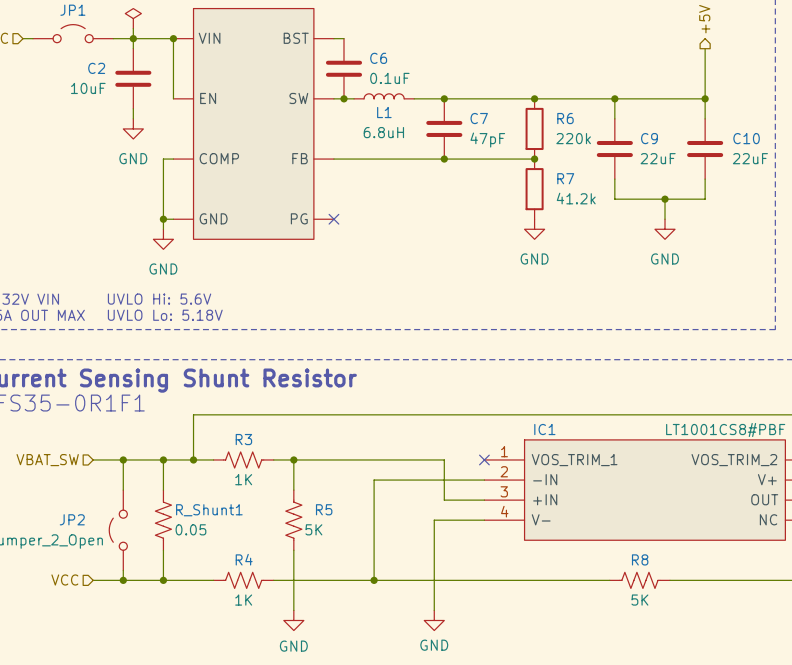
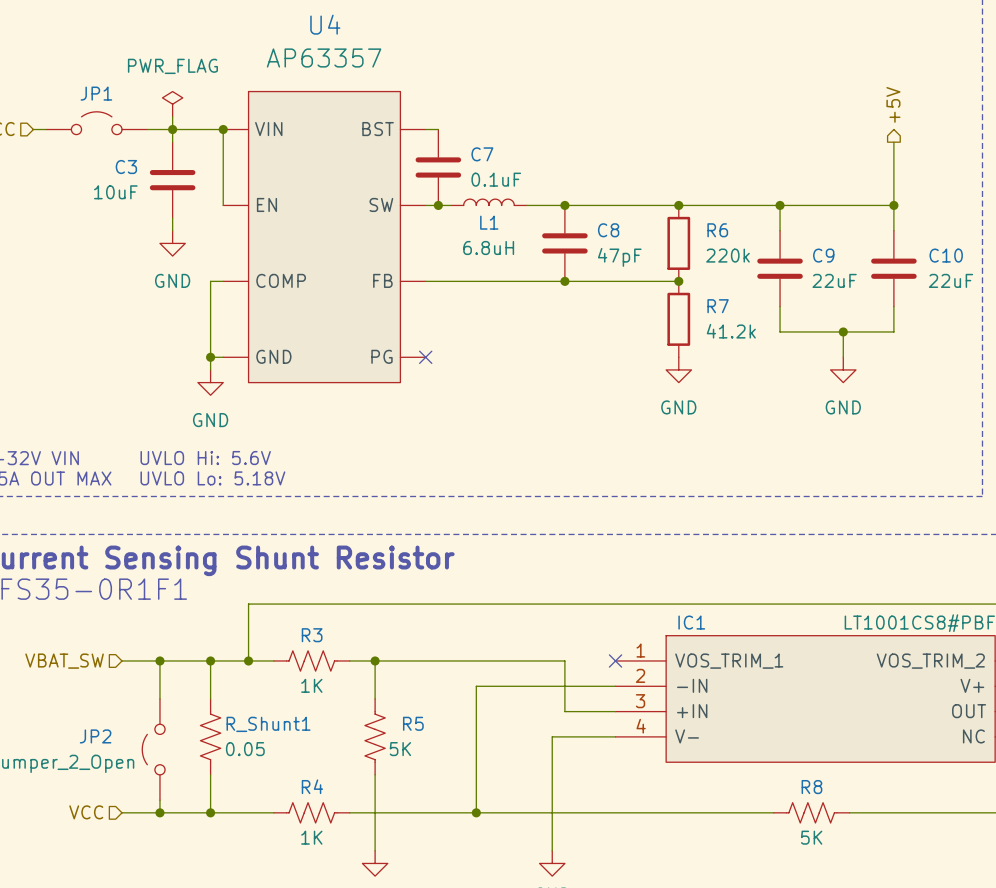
C6 name: C6 (378, 58) -> C7 (482, 154)
C2 name: C2 (96, 68) -> C3 (126, 167)
C7 name: C7 (479, 118) -> C8 (608, 230)

